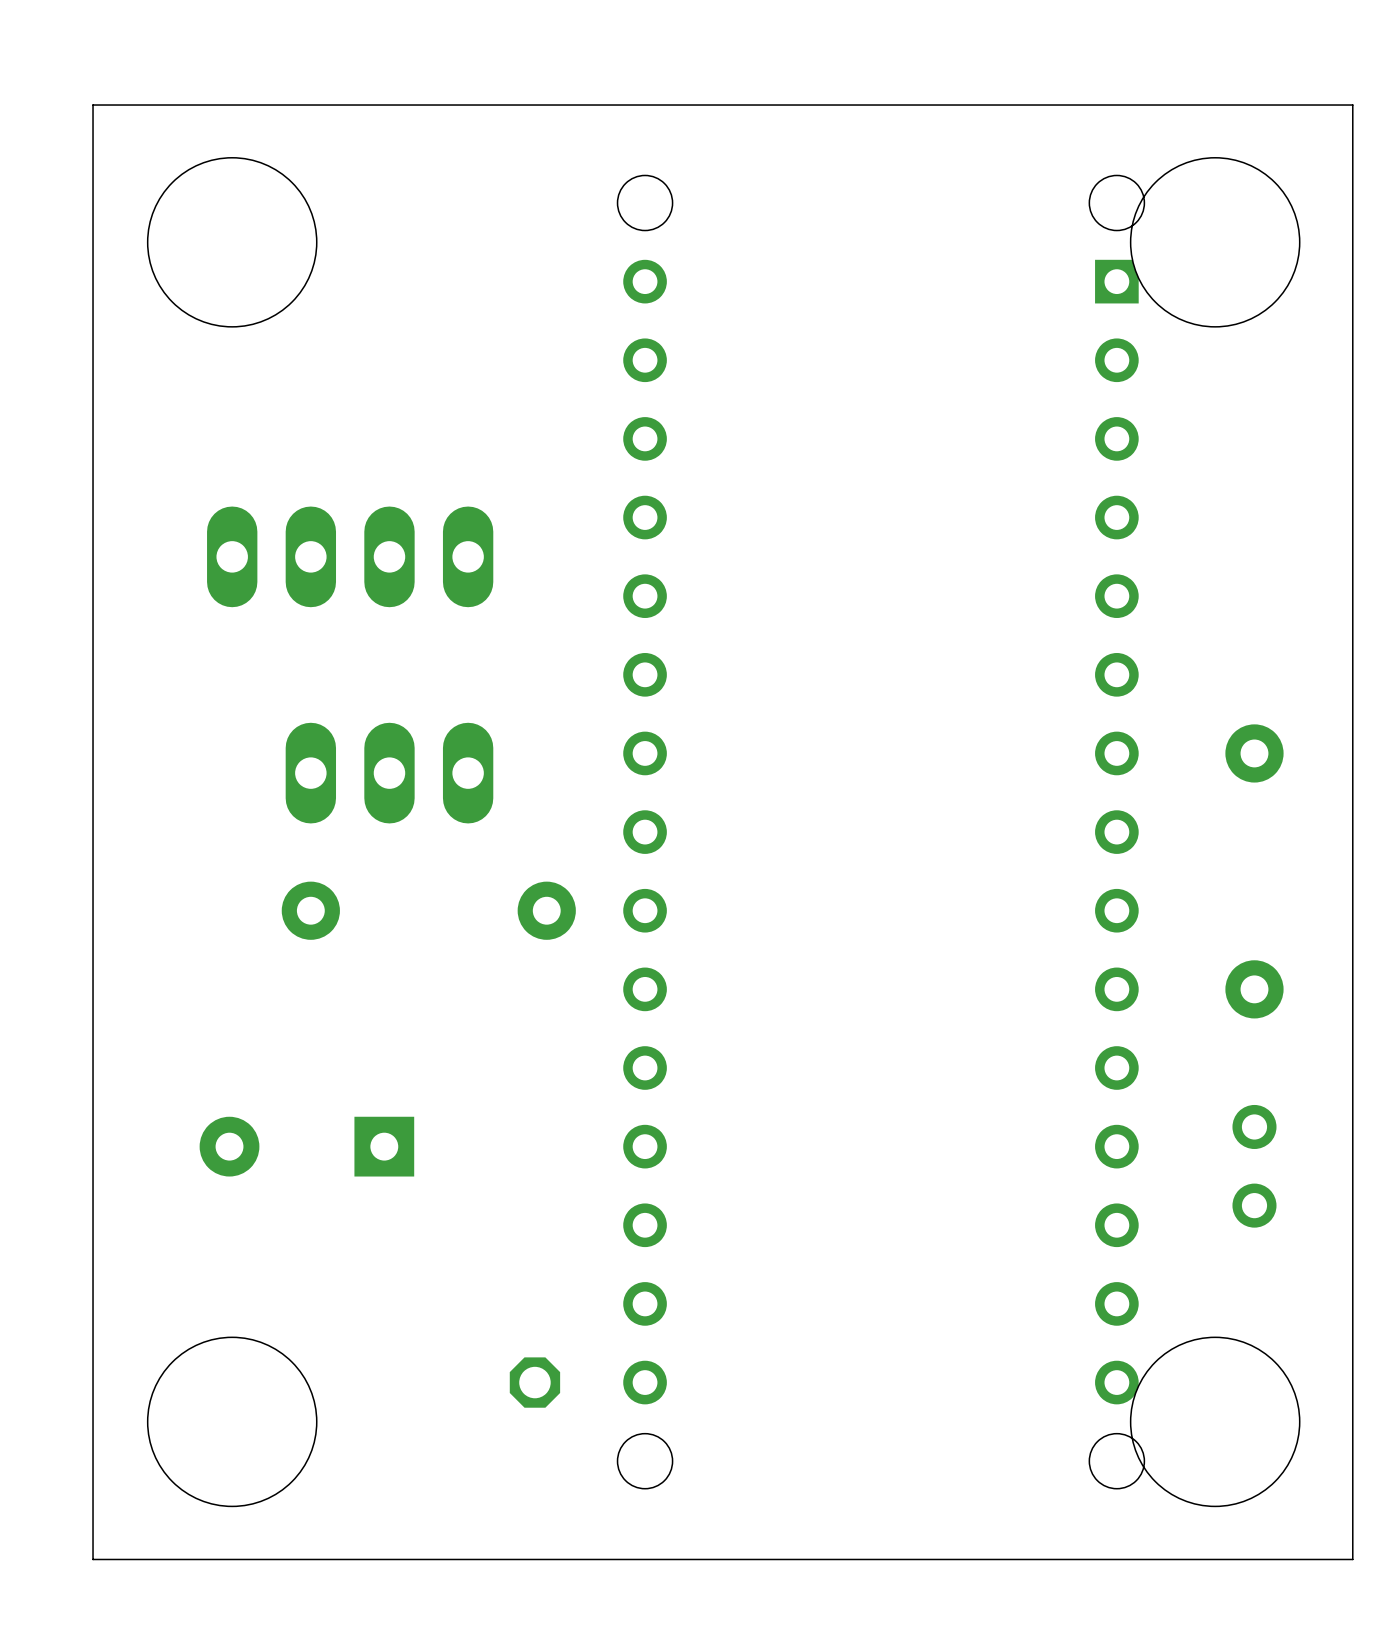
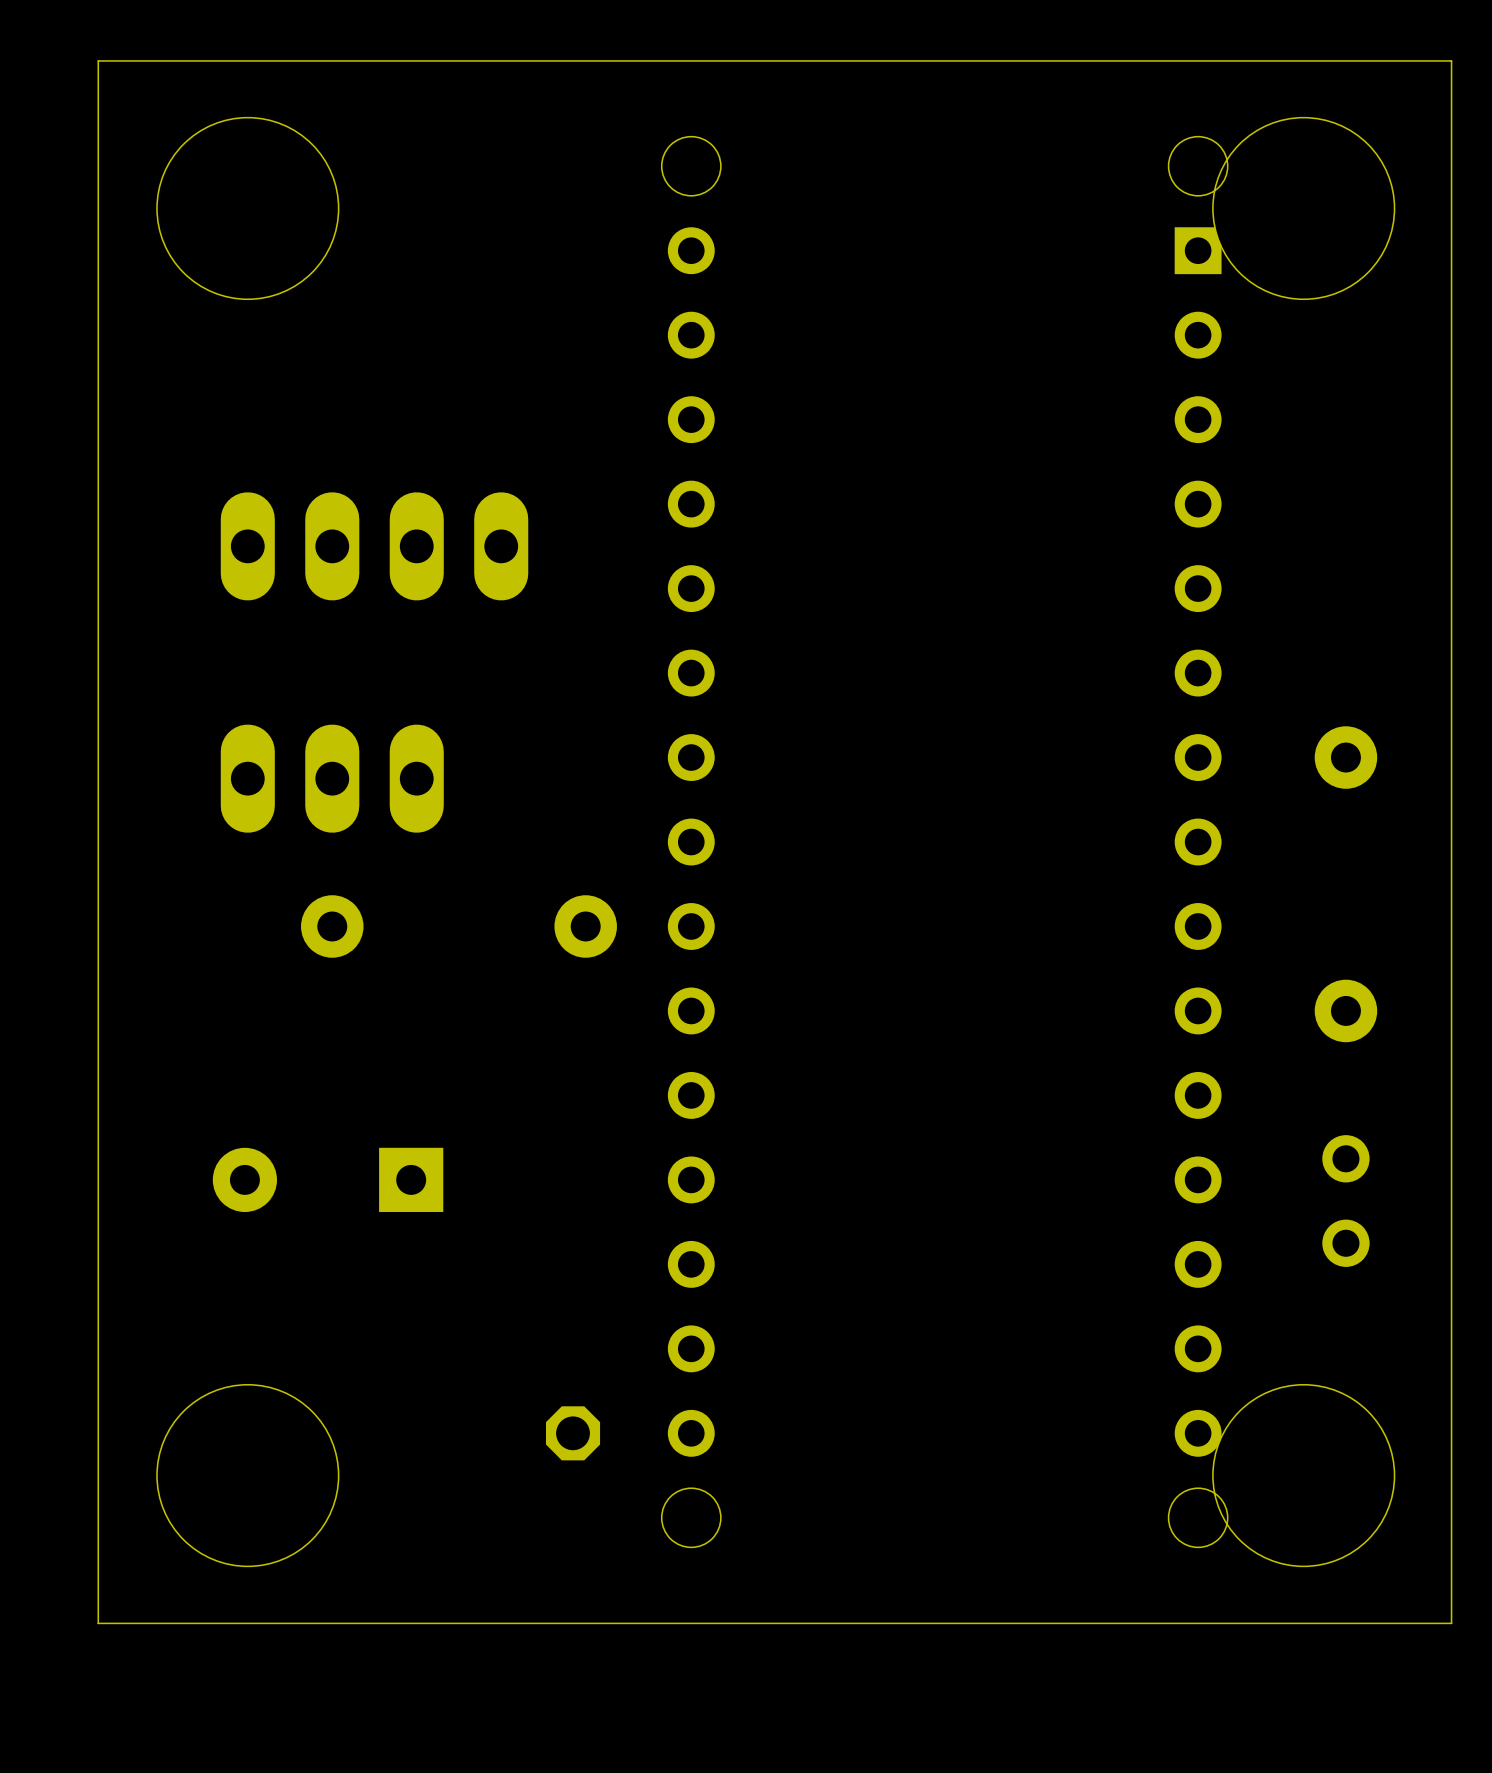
part position: (389, 773) -> (332, 778)

